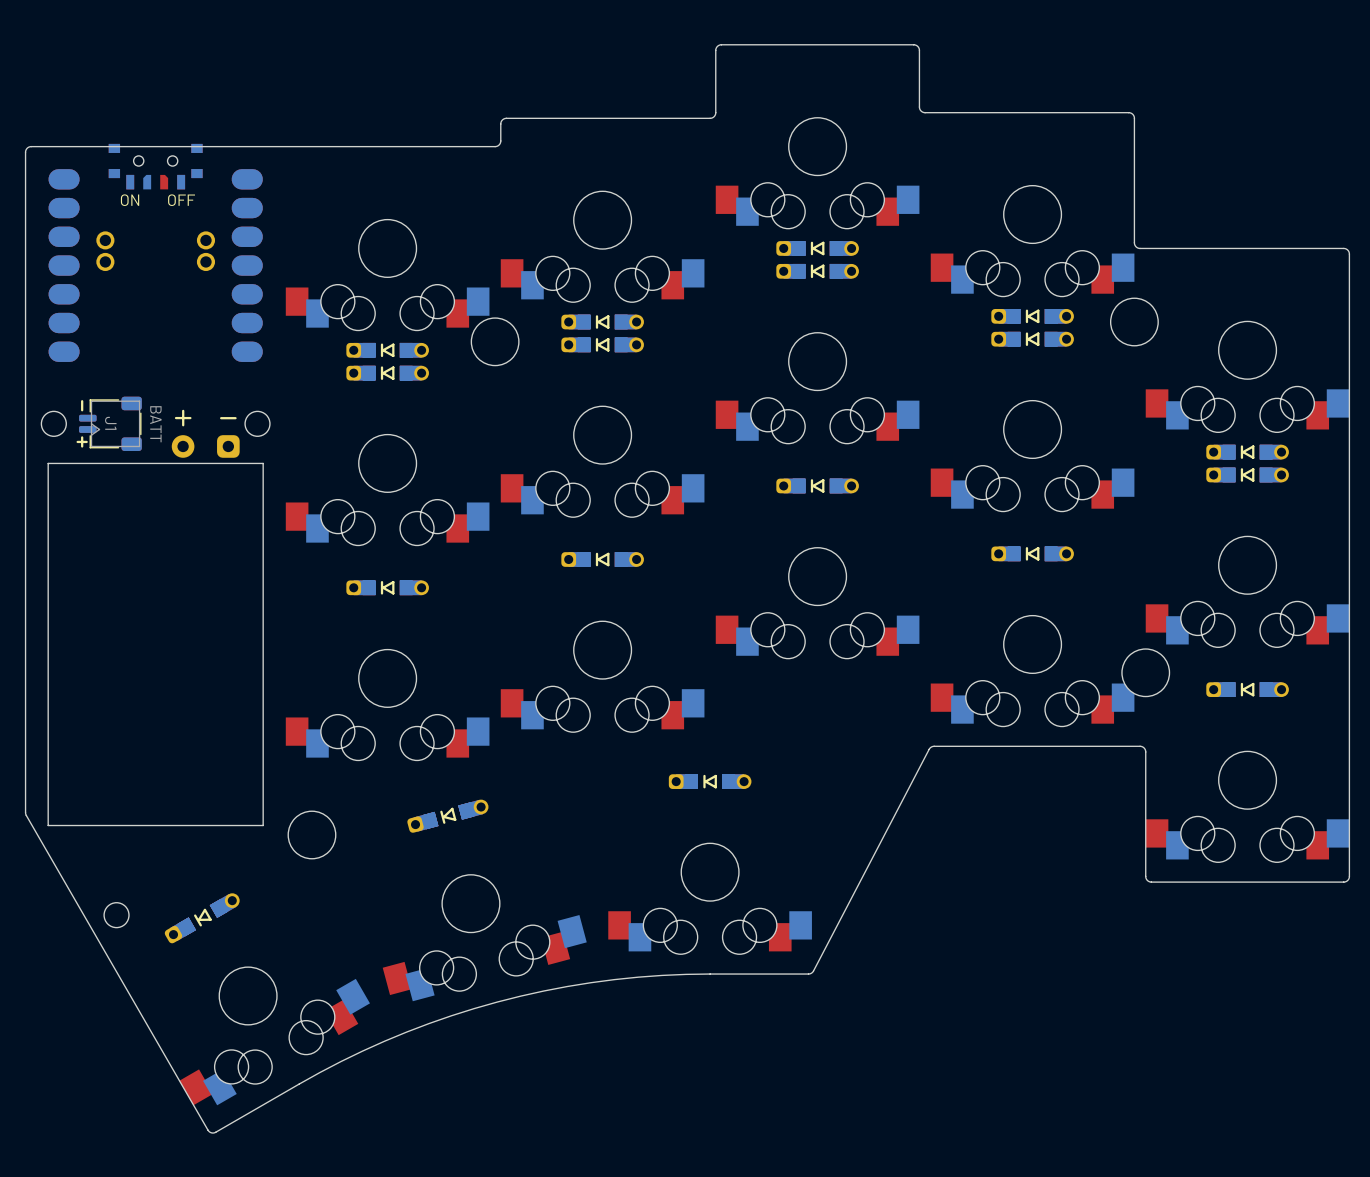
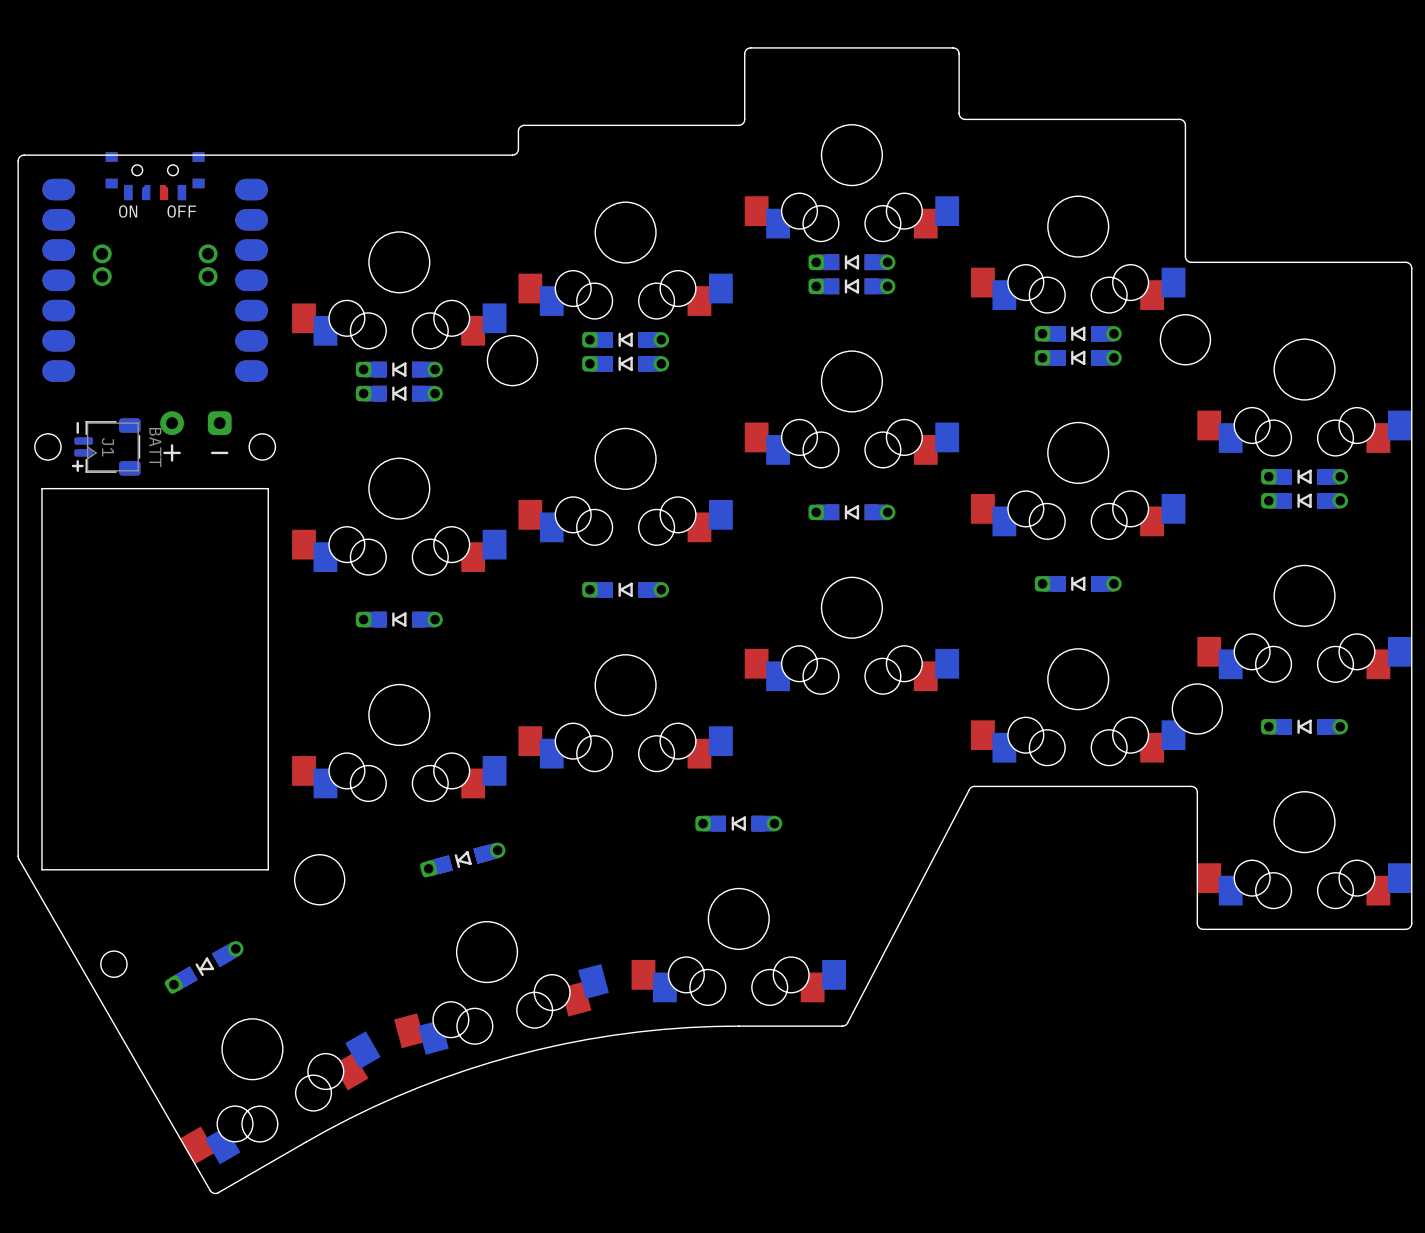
part: none -> (195, 436)
part: (205, 433) -> none

